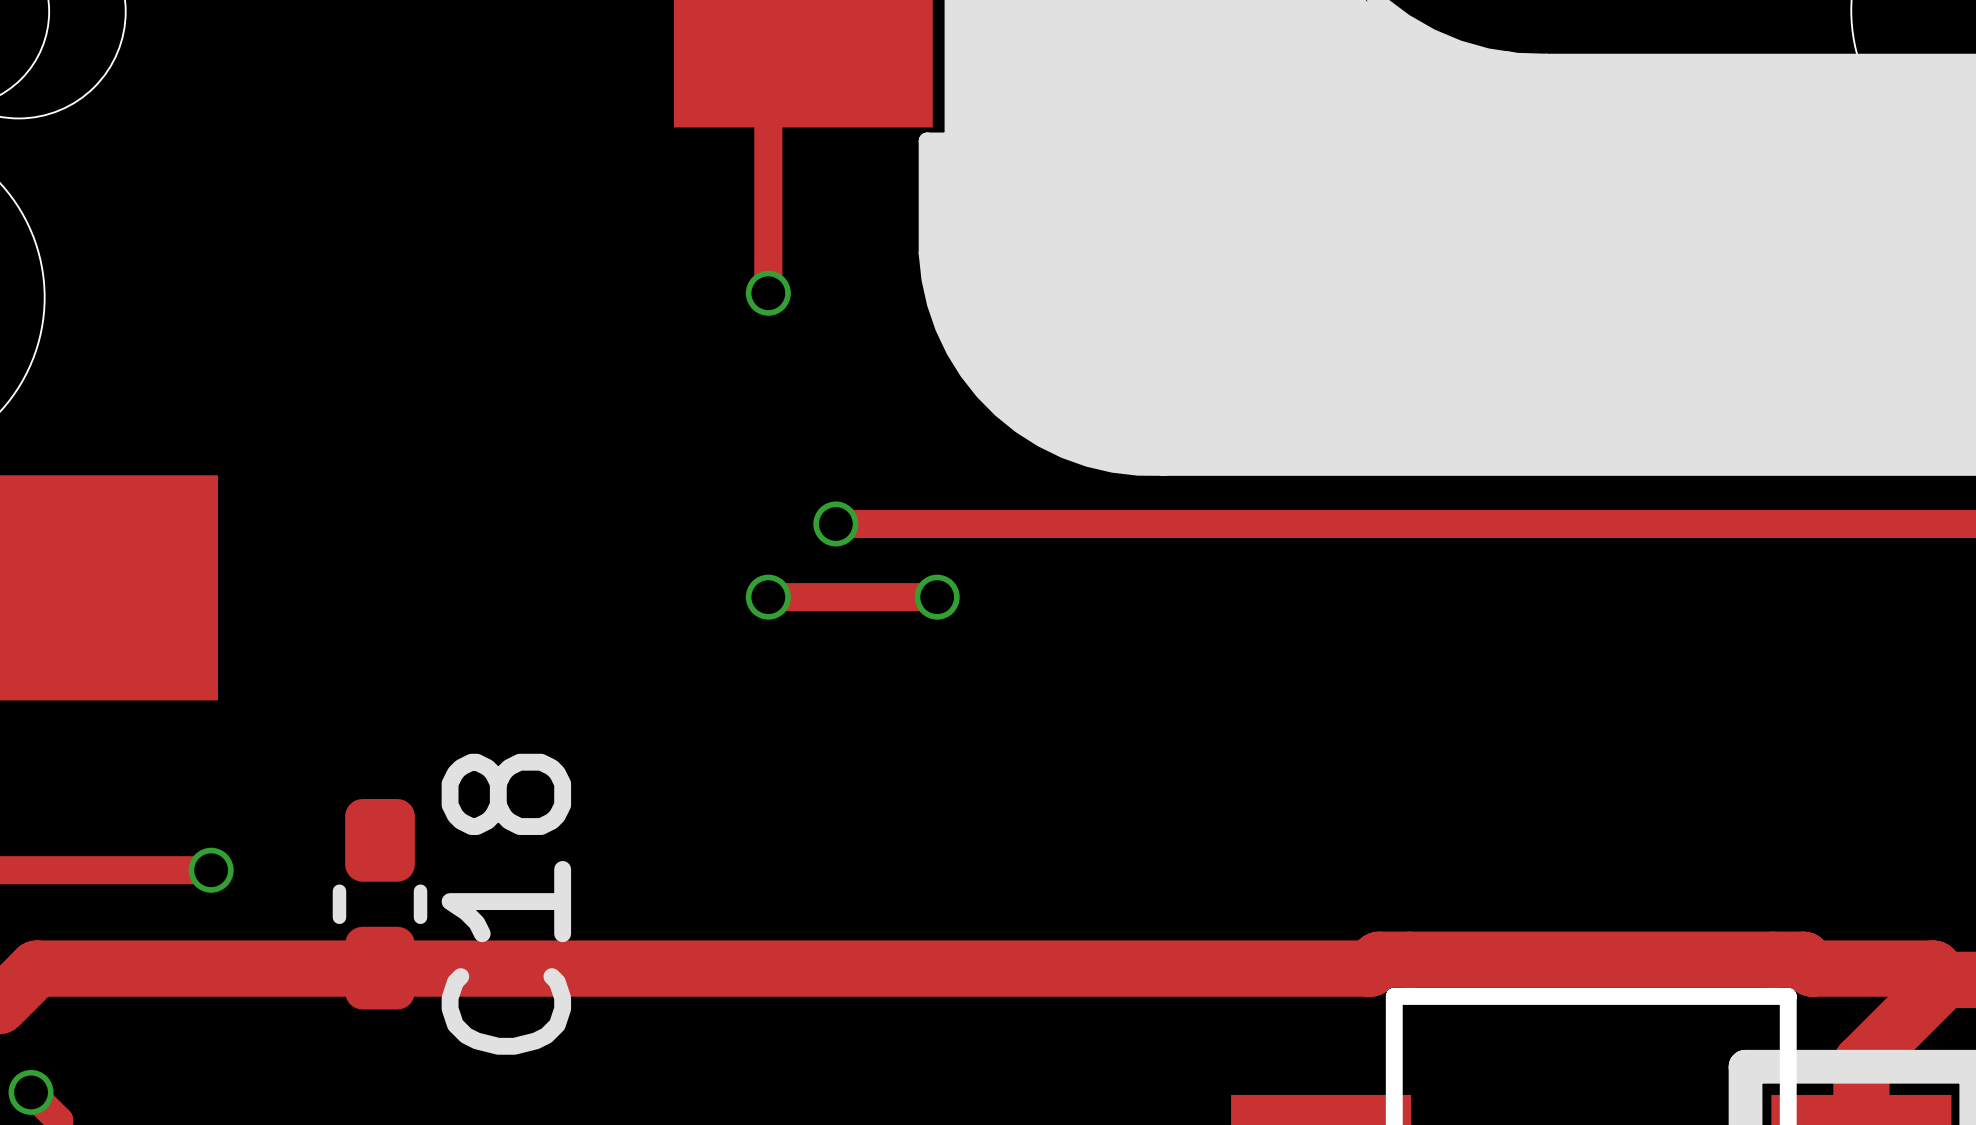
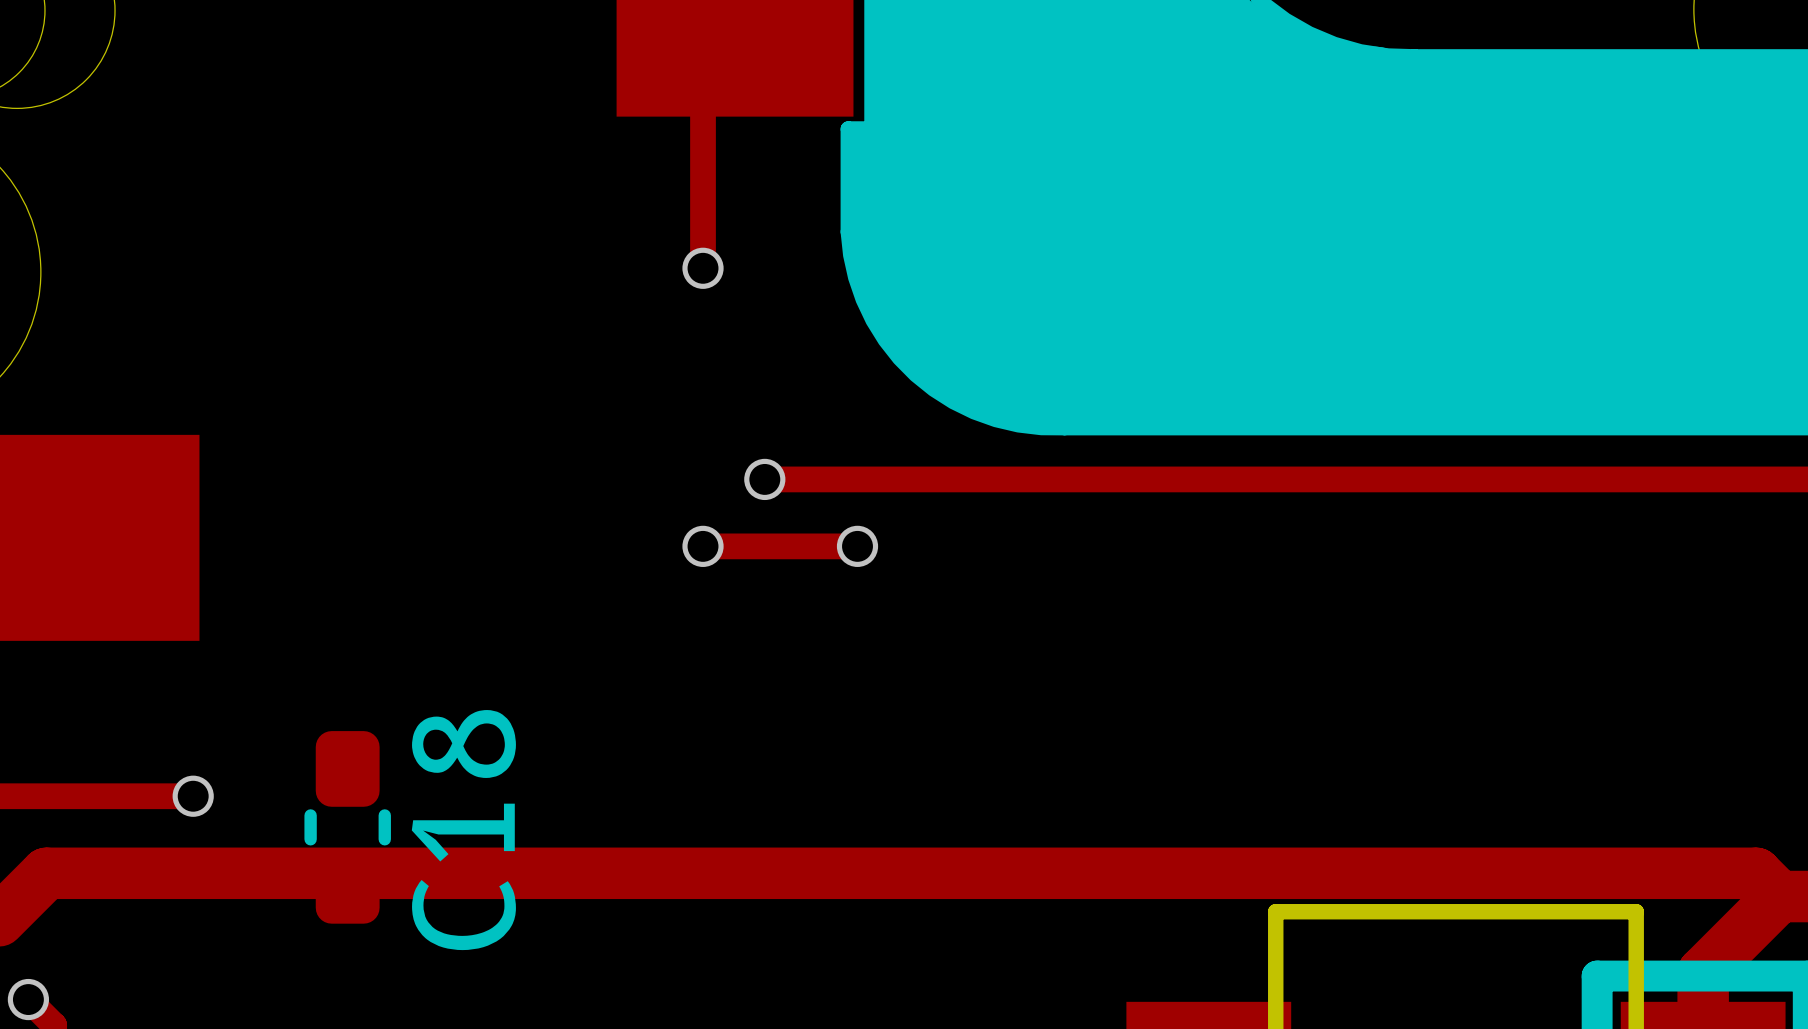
track: (36, 968) (1370, 968) (1379, 959) (1803, 959) (1812, 968) (1933, 968) -> (33, 886) (46, 873) (1756, 873) (1768, 886)

